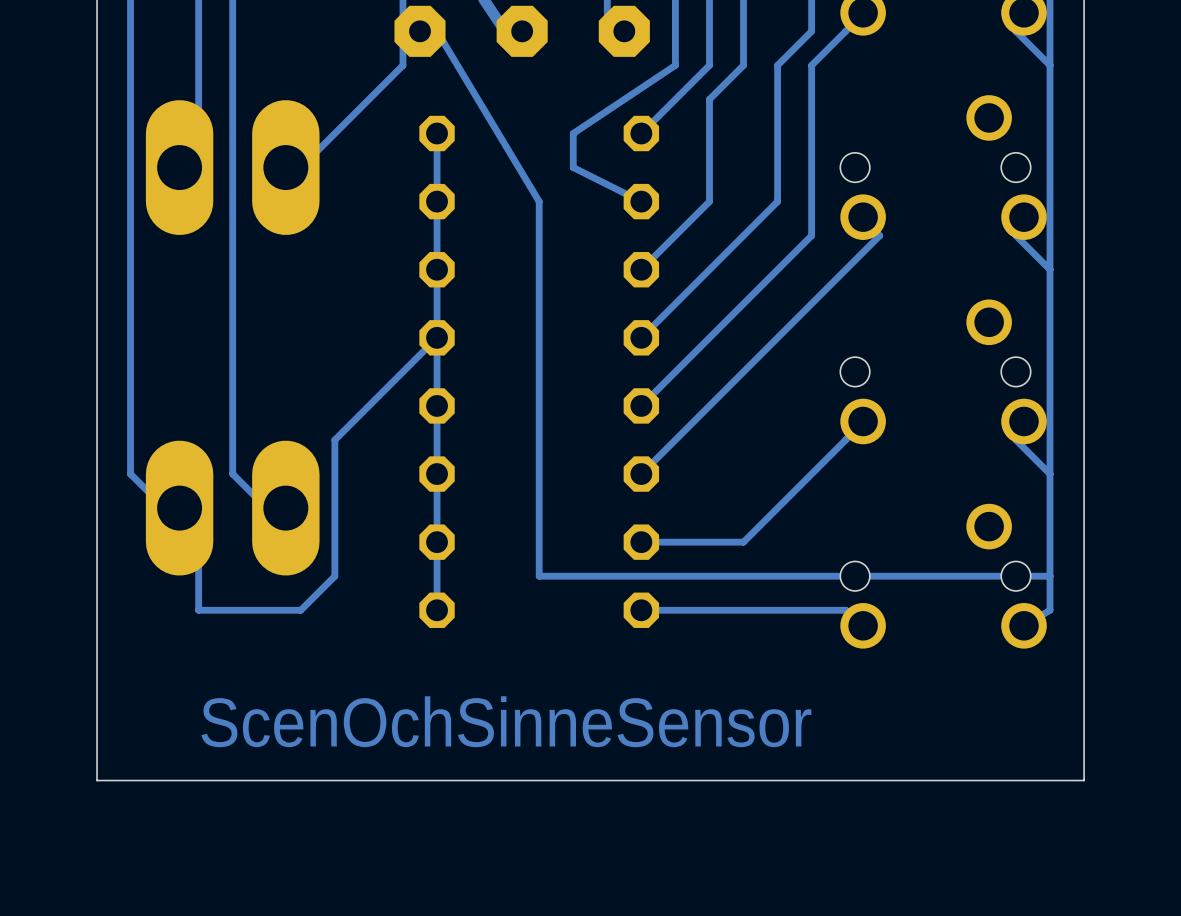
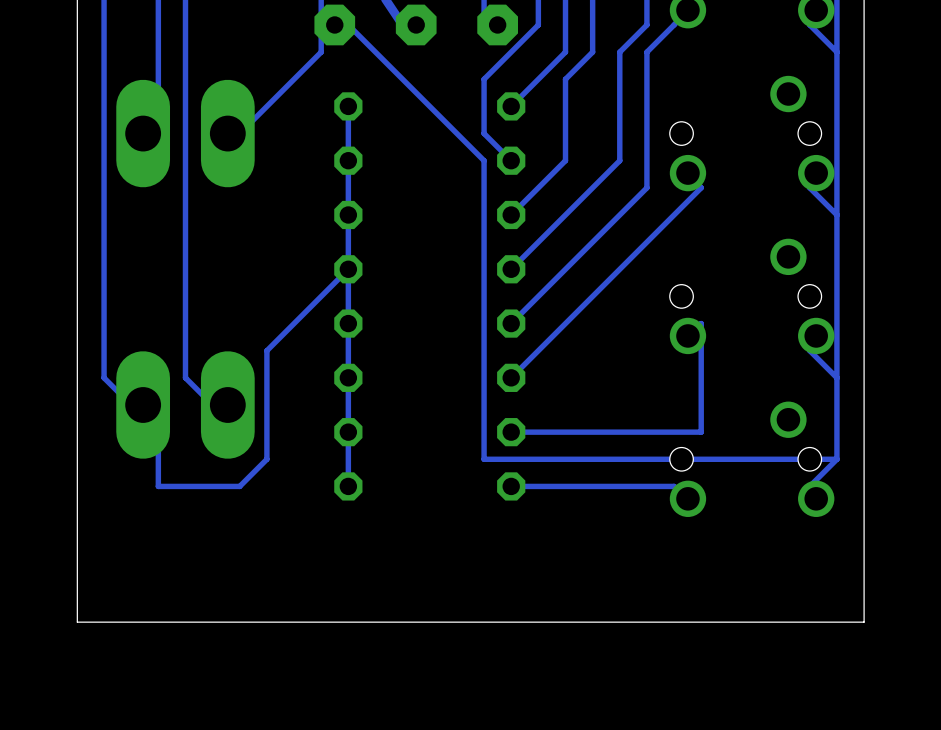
track: (437, 31) (539, 201) (539, 576) (607, 576) -> (348, 24) (484, 160) (484, 459)
track: (675, 31) (675, 65) (573, 133) (573, 167) (641, 201) -> (538, 24) (484, 79) (484, 133) (511, 160)
track: (863, 421) (743, 542) -> (687, 335) (701, 323) (701, 432) (592, 432)
track: (1050, 576) (1050, 610) (1024, 625) -> (836, 459) (809, 486) (816, 498)
text: ScenOchSinneSensor (506, 721) -> none

